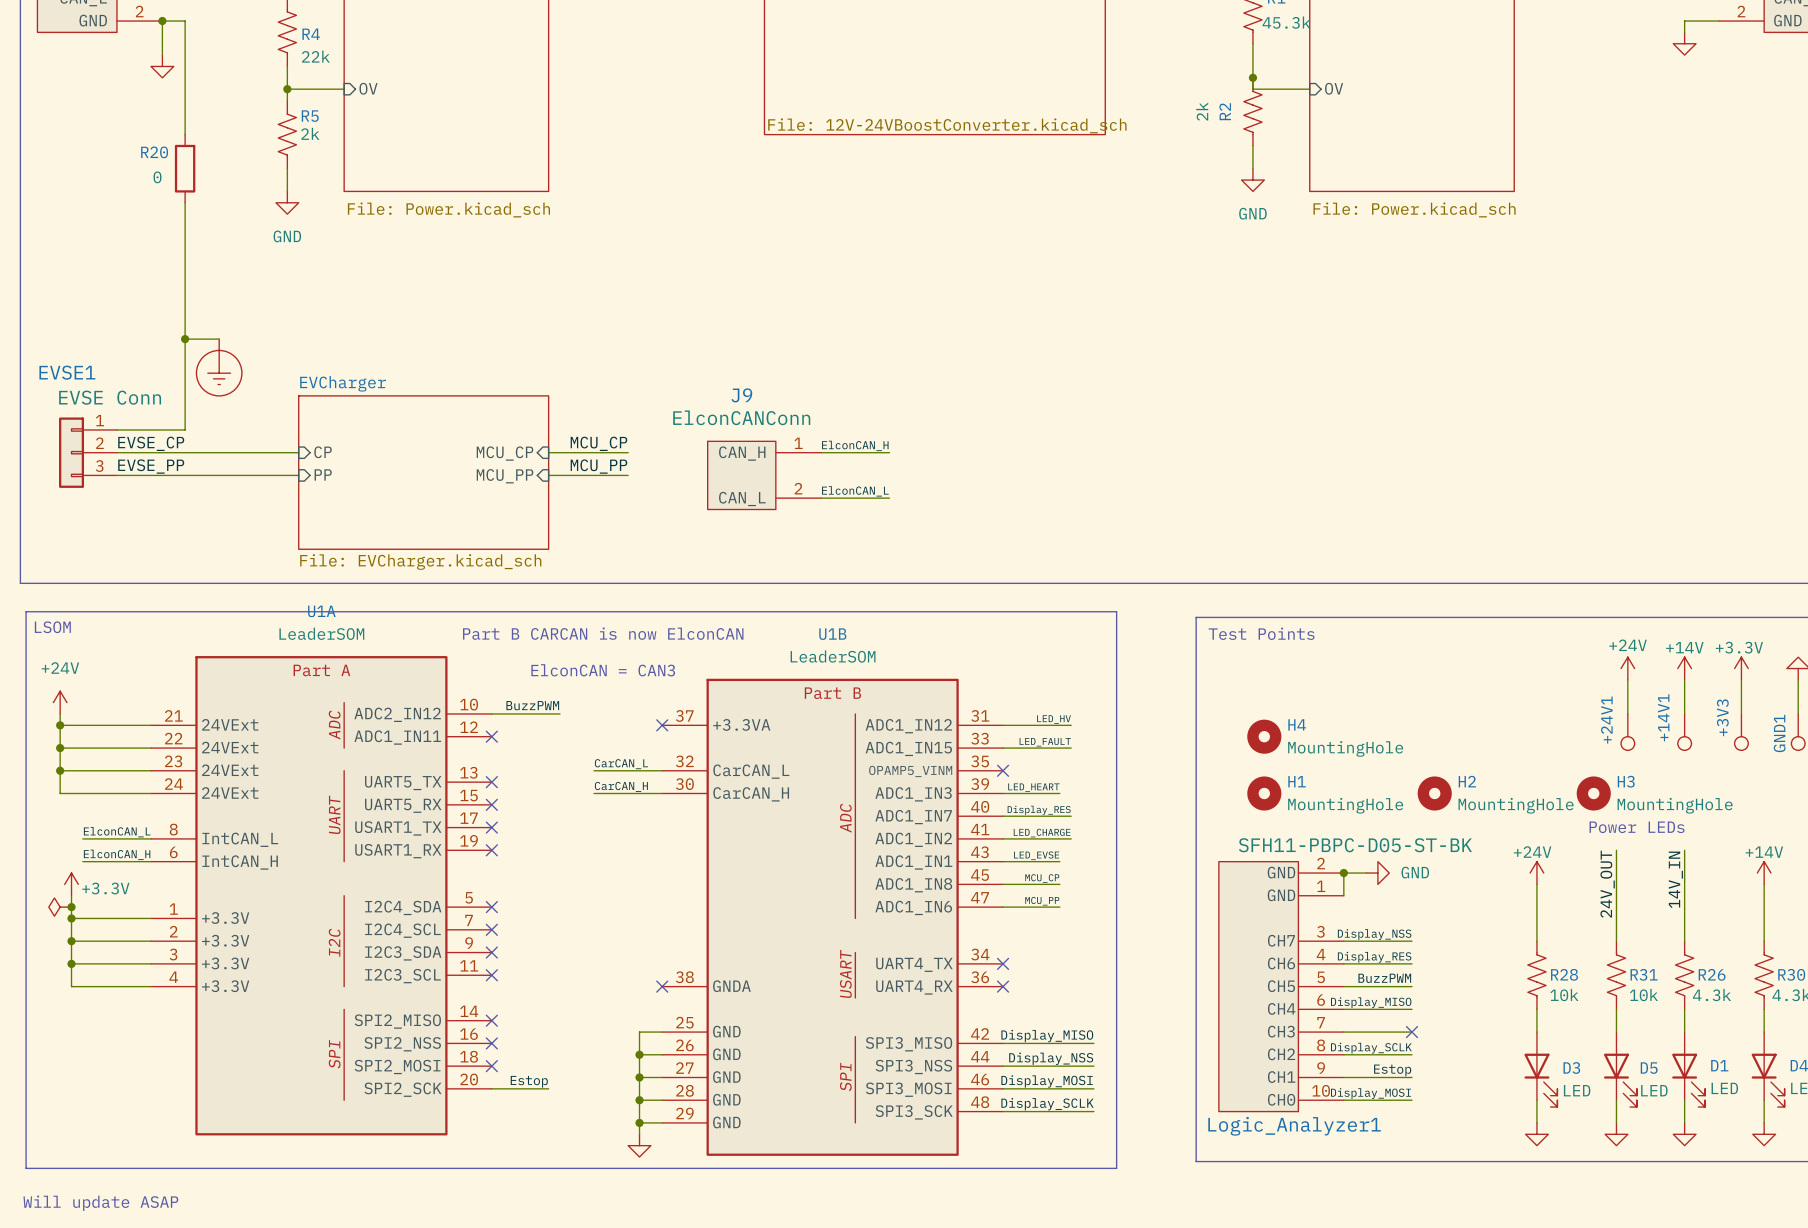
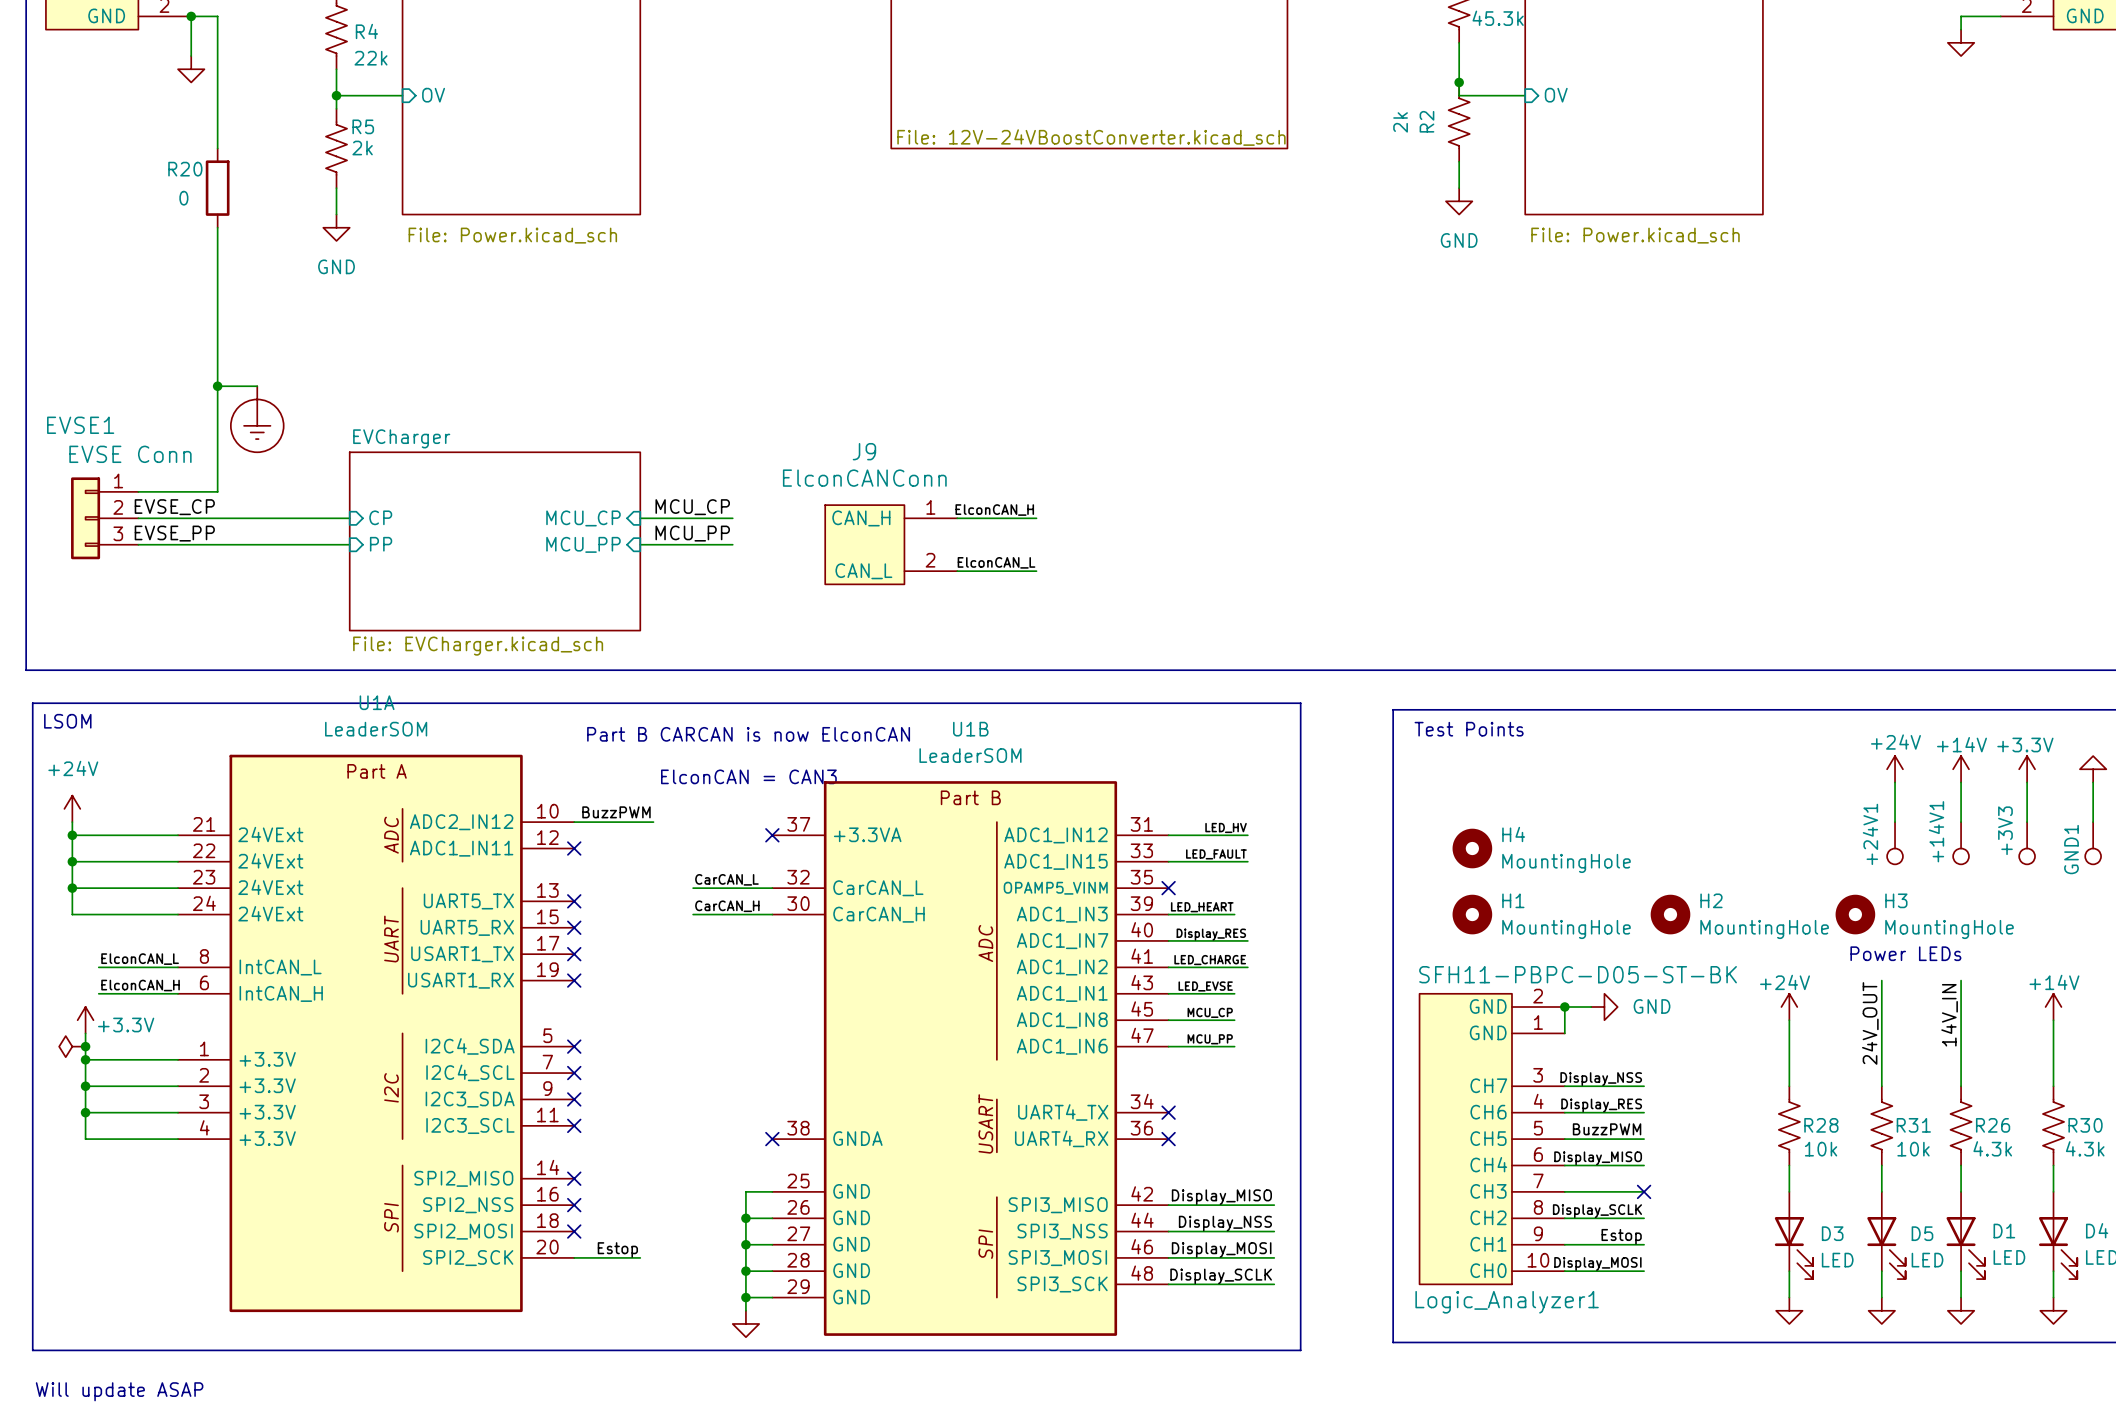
text position: Part B CARCAN is now ElconCAN (603, 633) -> Part B CARCAN is now ElconCAN (748, 734)
text position: ElconCAN = CAN3 (603, 670) -> ElconCAN = CAN3 (748, 776)

